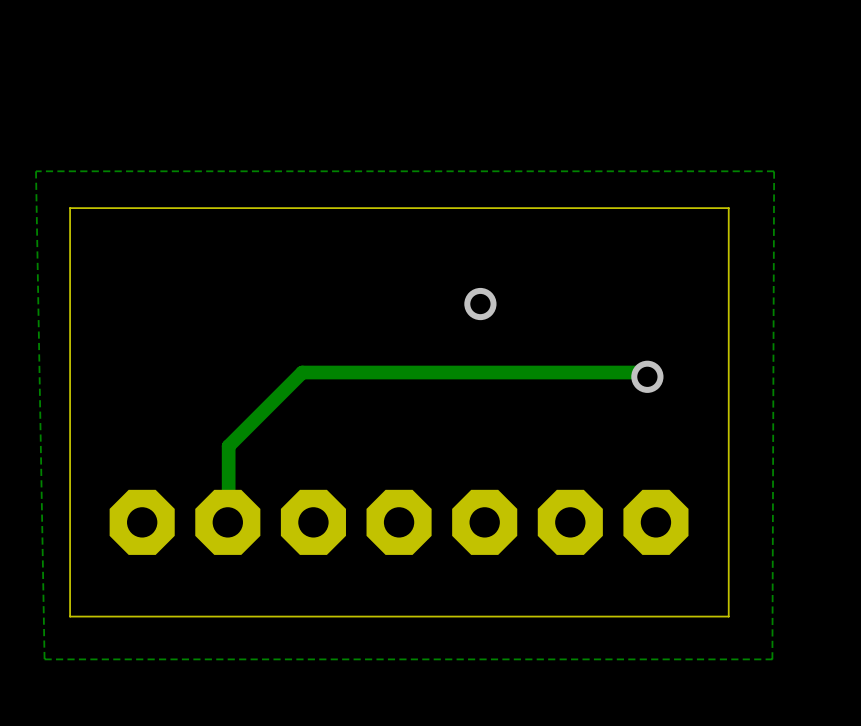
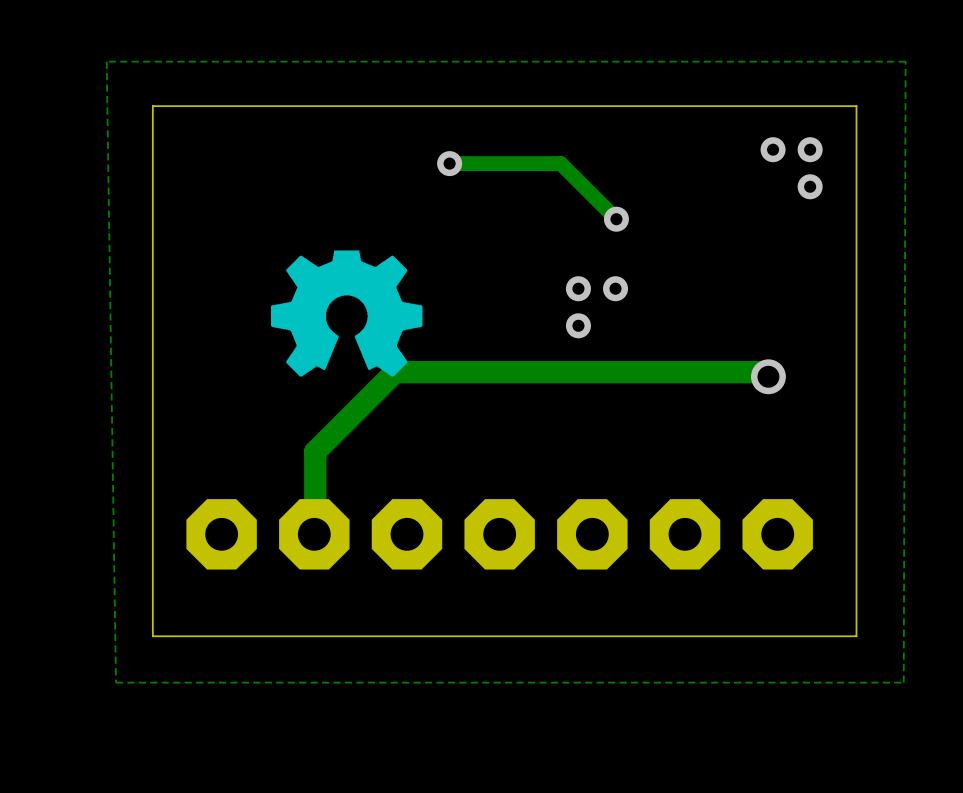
via: none -> (773, 149)
via: none -> (810, 149)
track: none -> (449, 163) (560, 163) (616, 219)
via: none -> (449, 163)
via: none -> (810, 186)
board edge: (728, 208) (70, 208) (70, 616) (78, 616) -> (856, 194) (856, 106) (152, 106) (152, 636)
via: none -> (616, 219)
drawing: none -> [270, 250, 423, 377]
via size: [464, 287, 497, 321] -> [565, 276, 591, 302]
via: none -> (615, 288)
via: none -> (578, 325)
track width: thin (643, 372) (302, 372) (228, 446) (228, 521) -> thick (763, 372) (394, 372) (315, 451) (315, 533)
zone outline: (772, 659) (774, 171) (36, 171) (44, 659) -> (903, 682) (905, 61) (106, 61) (115, 682)

